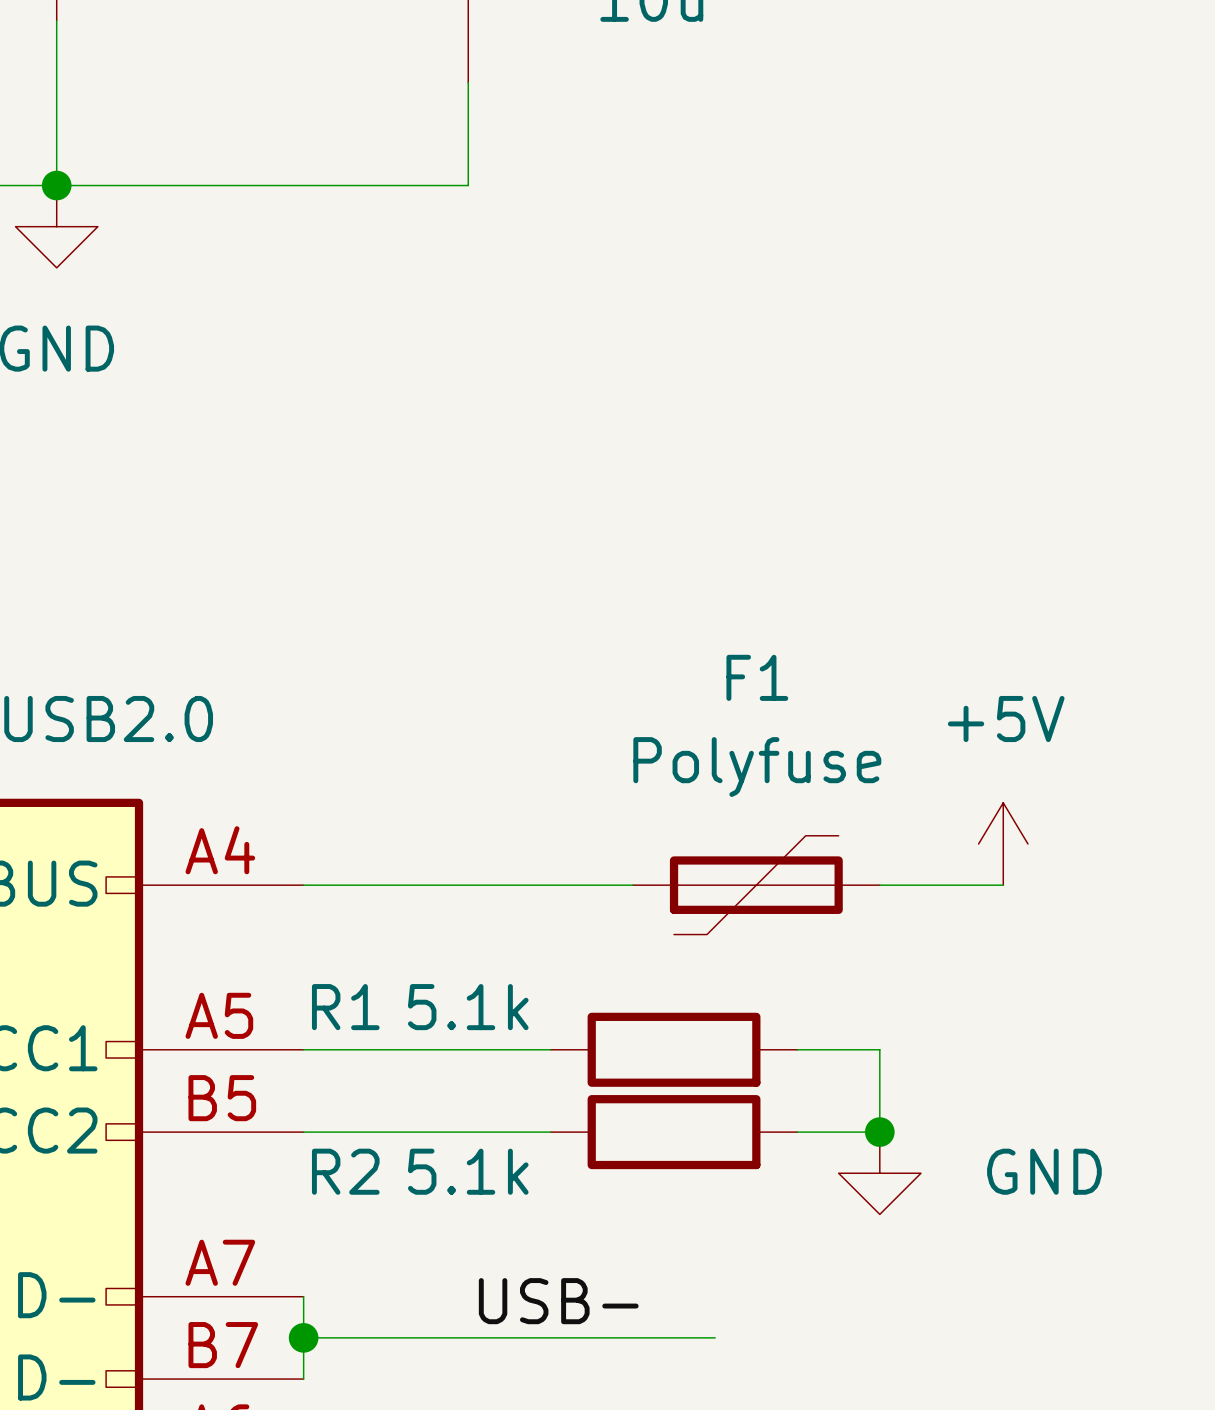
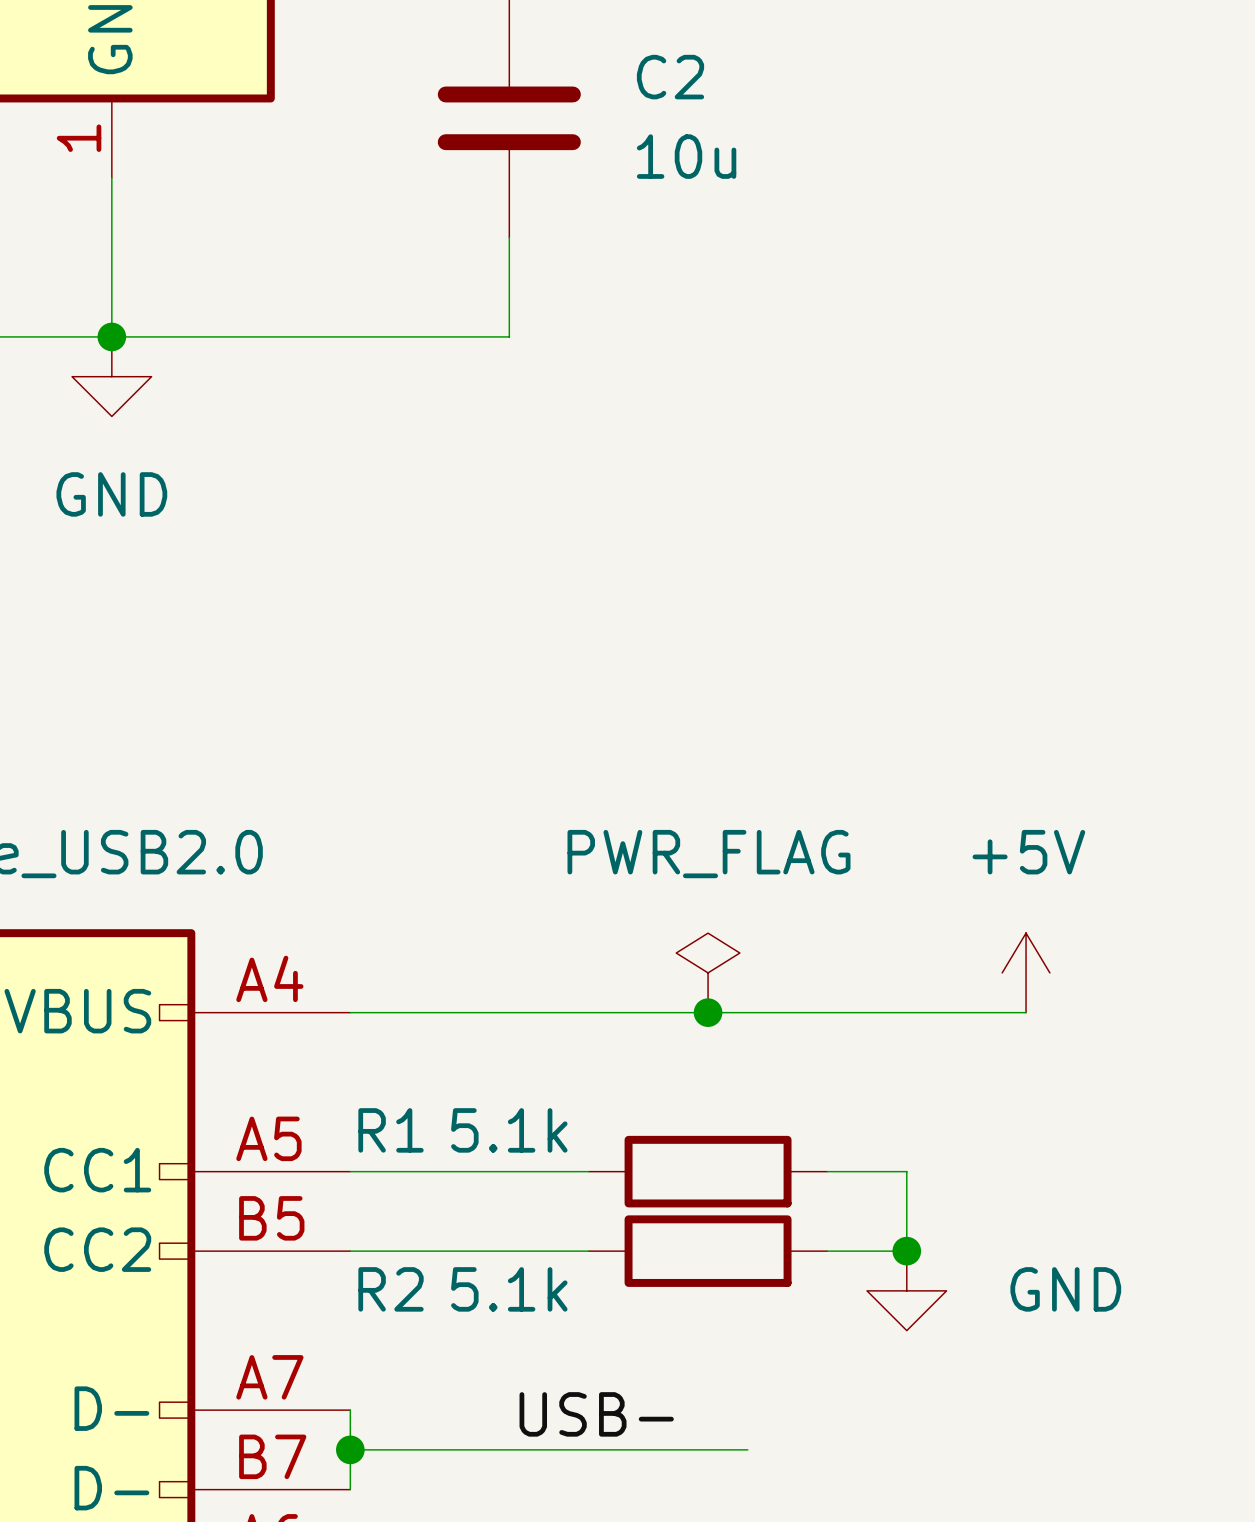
power symbol: none -> PWR_FLAG (708, 972)
junction: none -> (708, 1012)
F1: Polyfuse (756, 885) -> none

